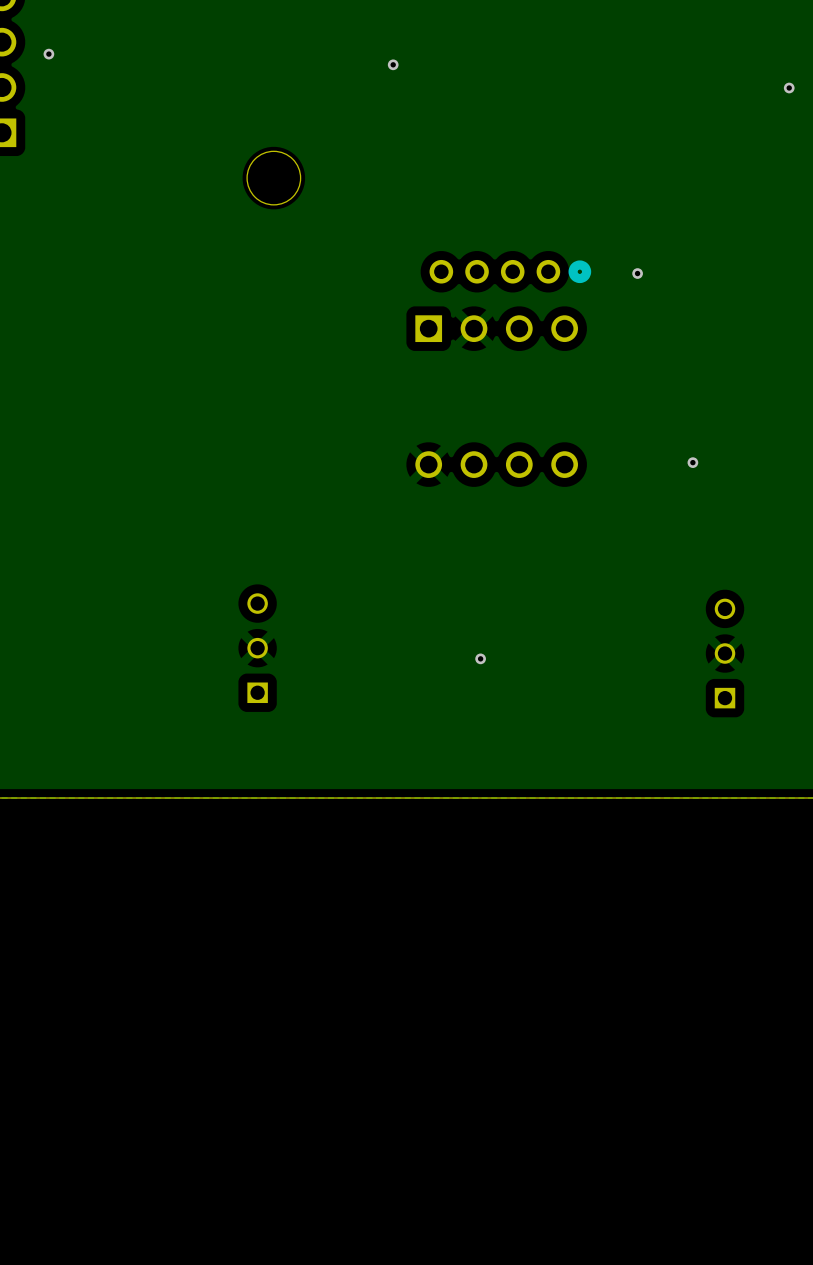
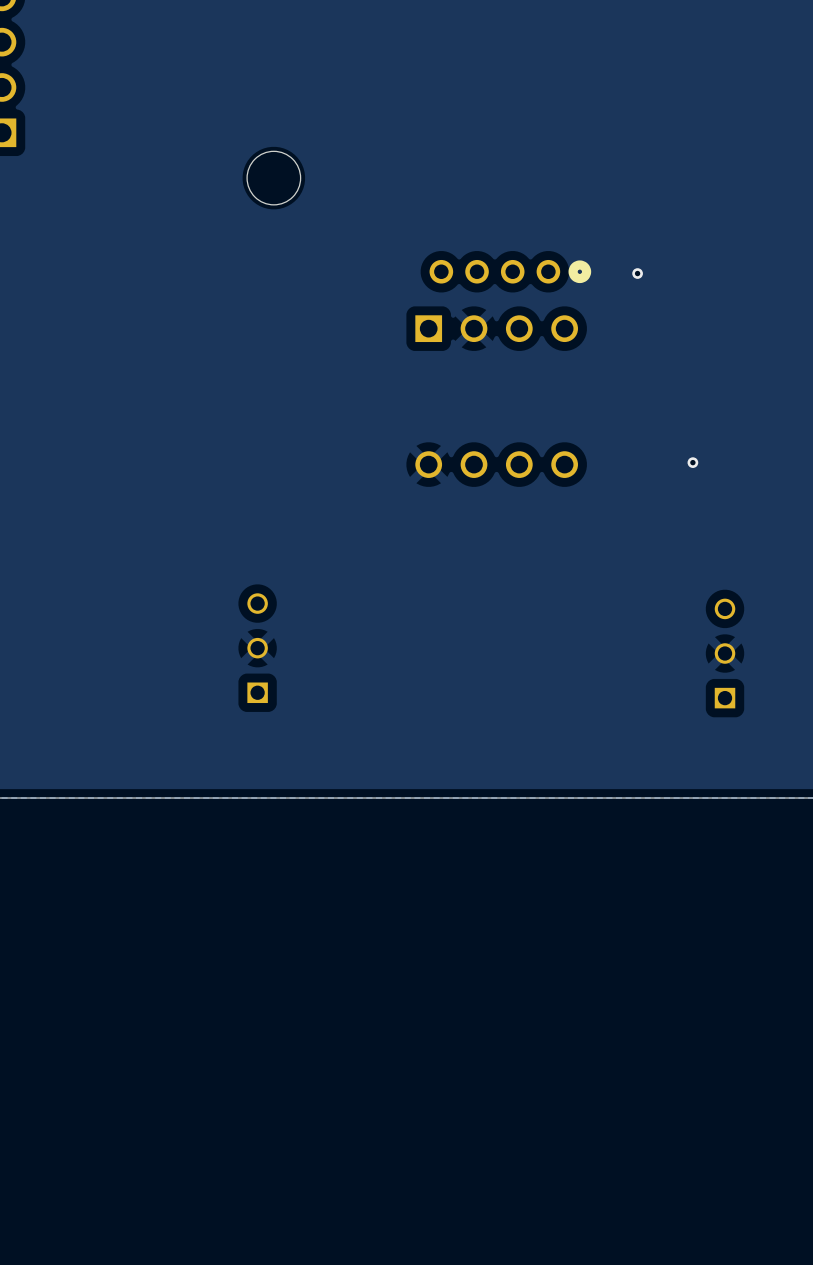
via: (48, 54) -> none
via: (393, 64) -> none
via: (789, 88) -> none
via: (480, 658) -> none

